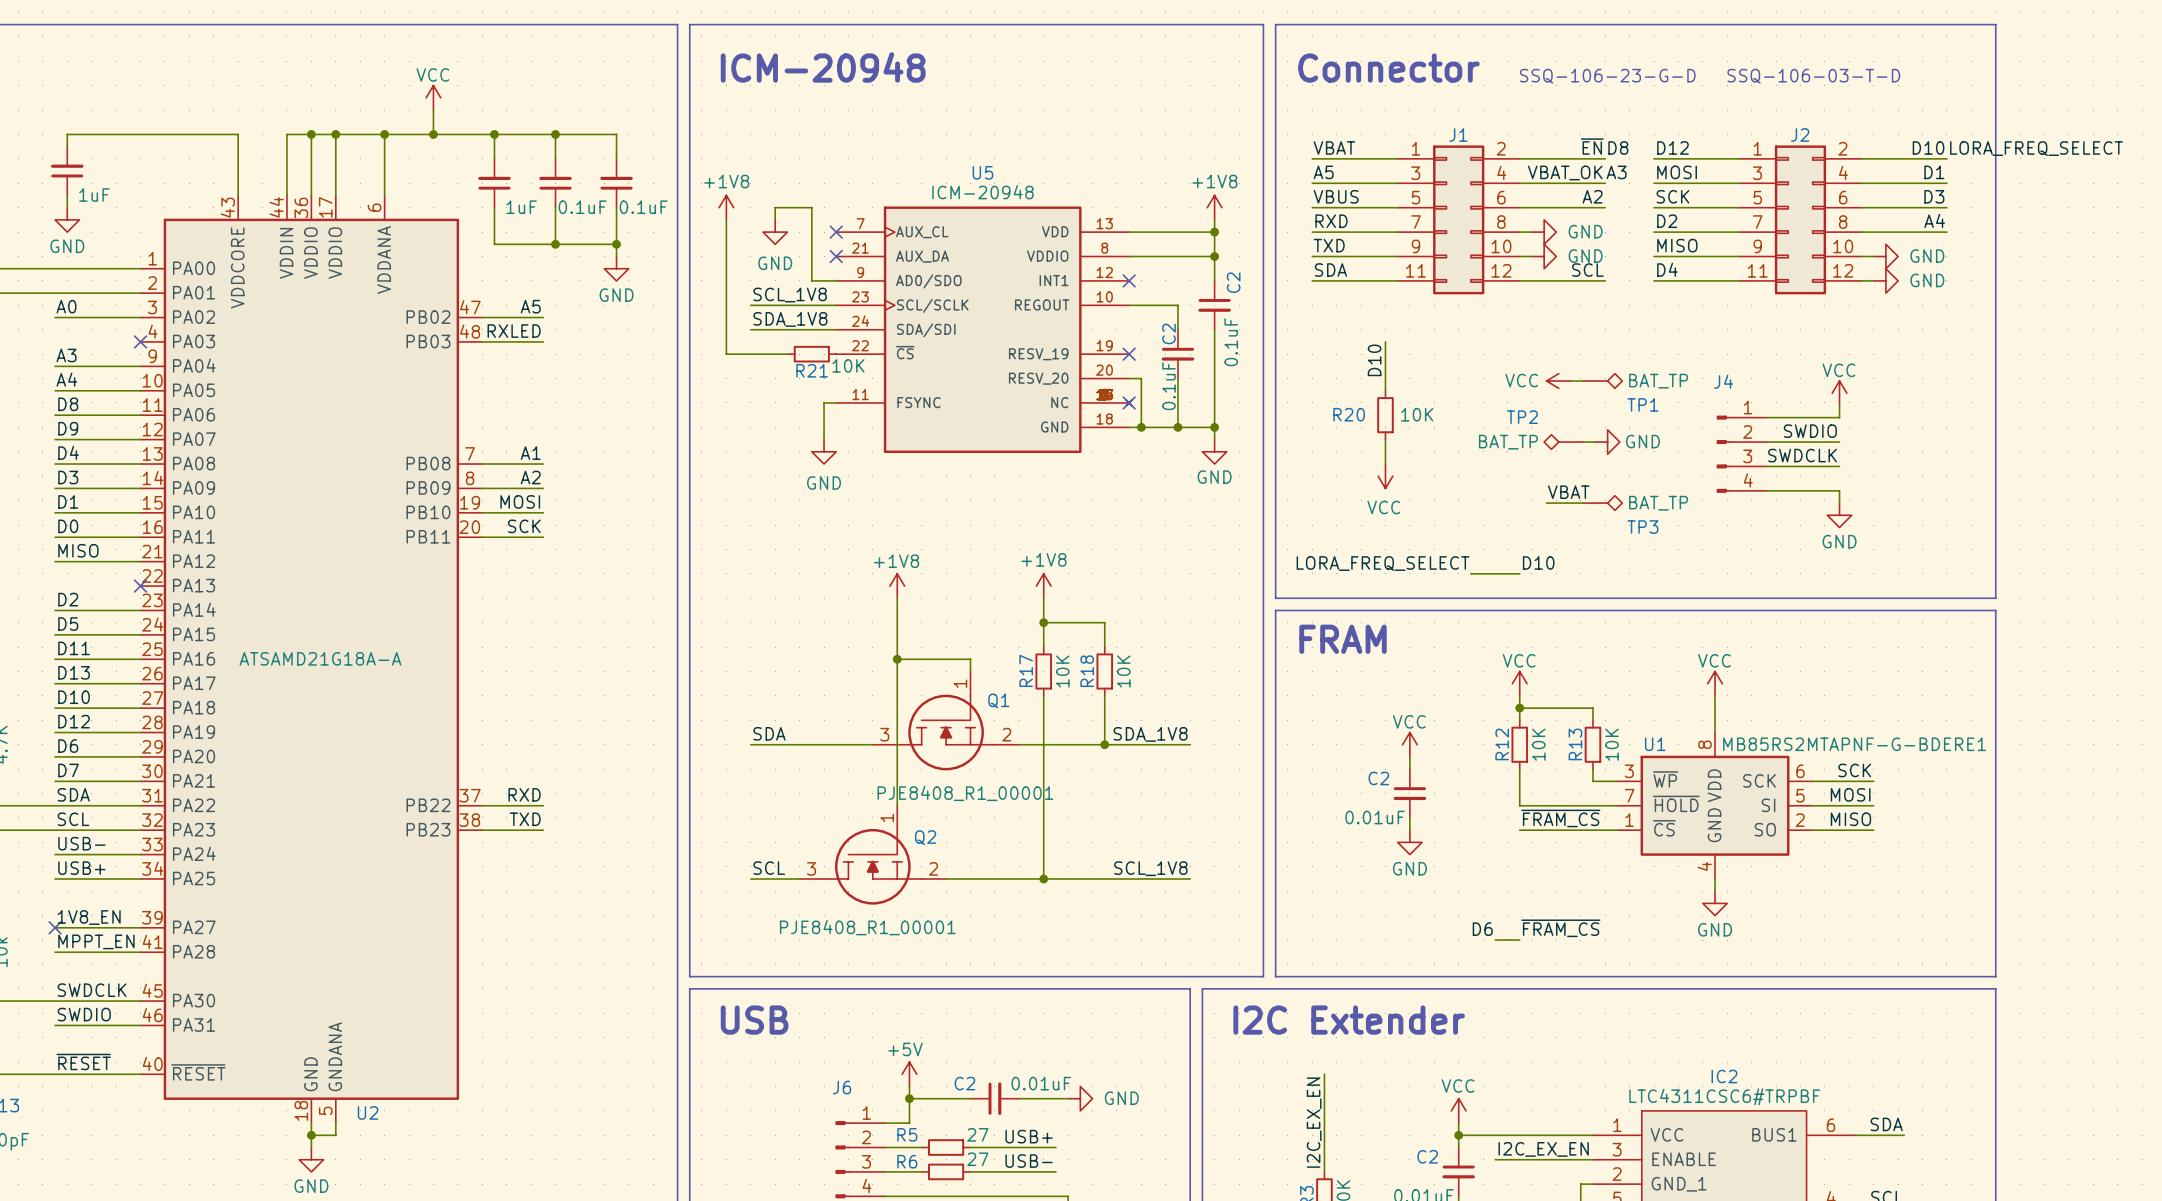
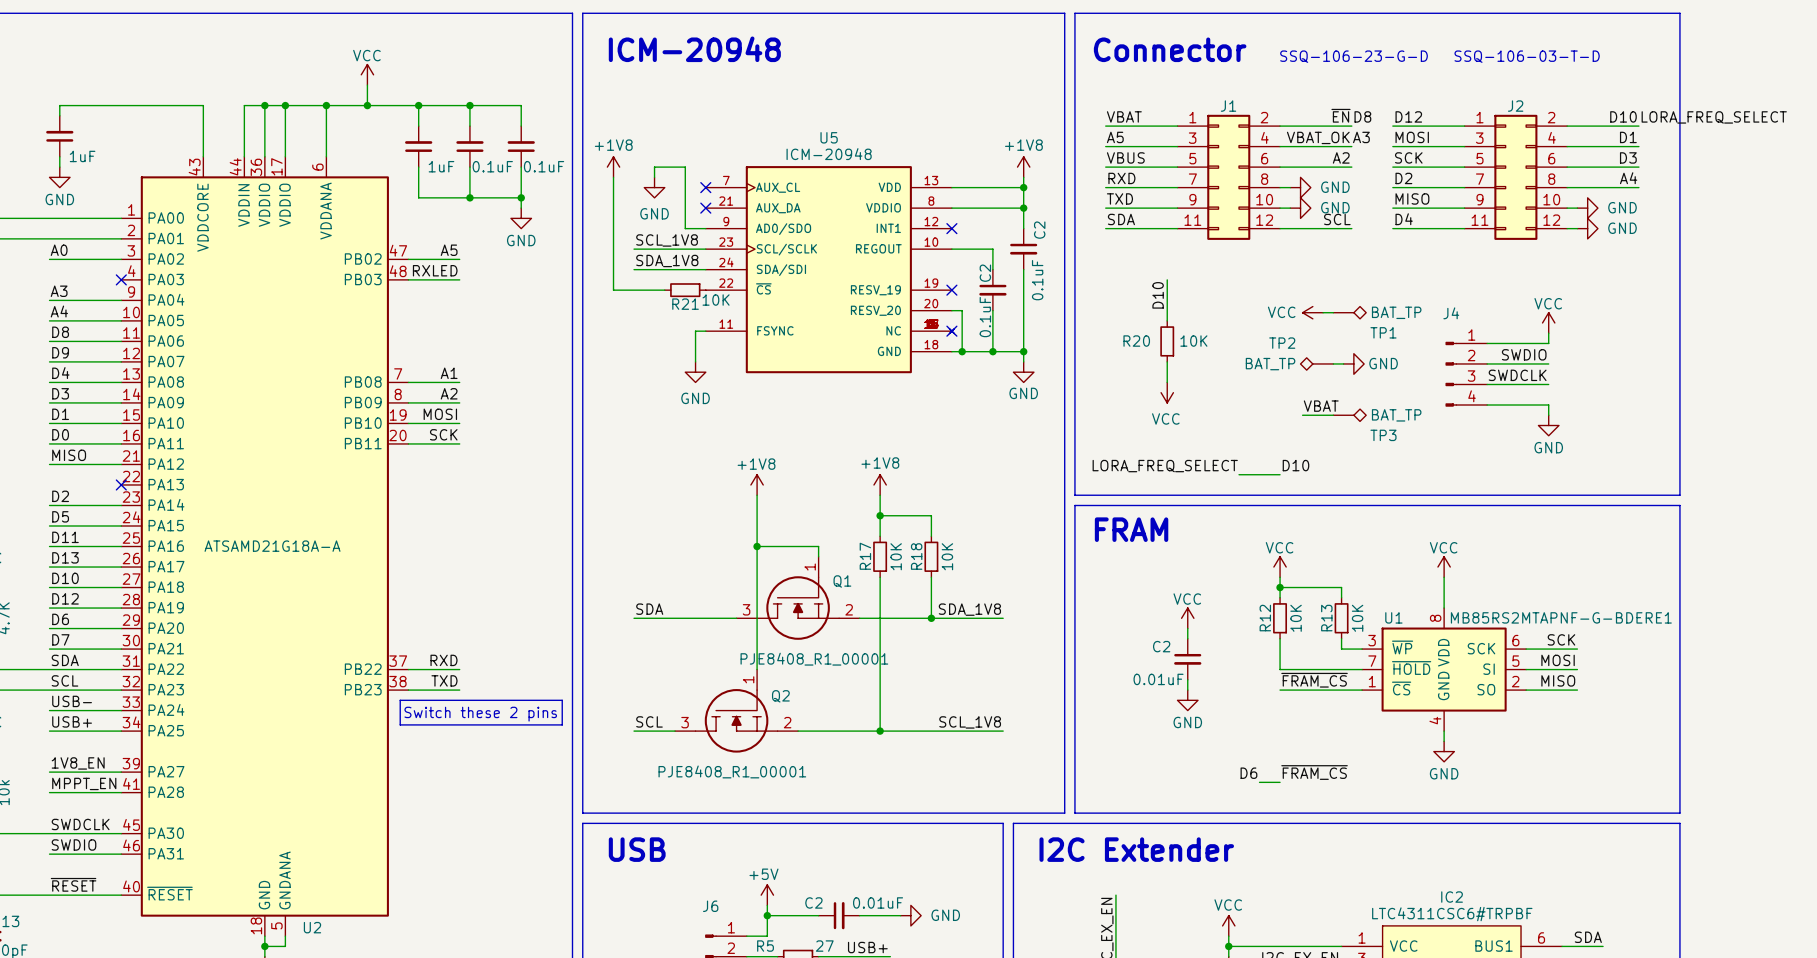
line: none -> (400, 700) (562, 700) (562, 724) (400, 724) (400, 700)
text: none -> Switch these 2 pins (480, 714)
no-connect mark: (55, 927) -> none

